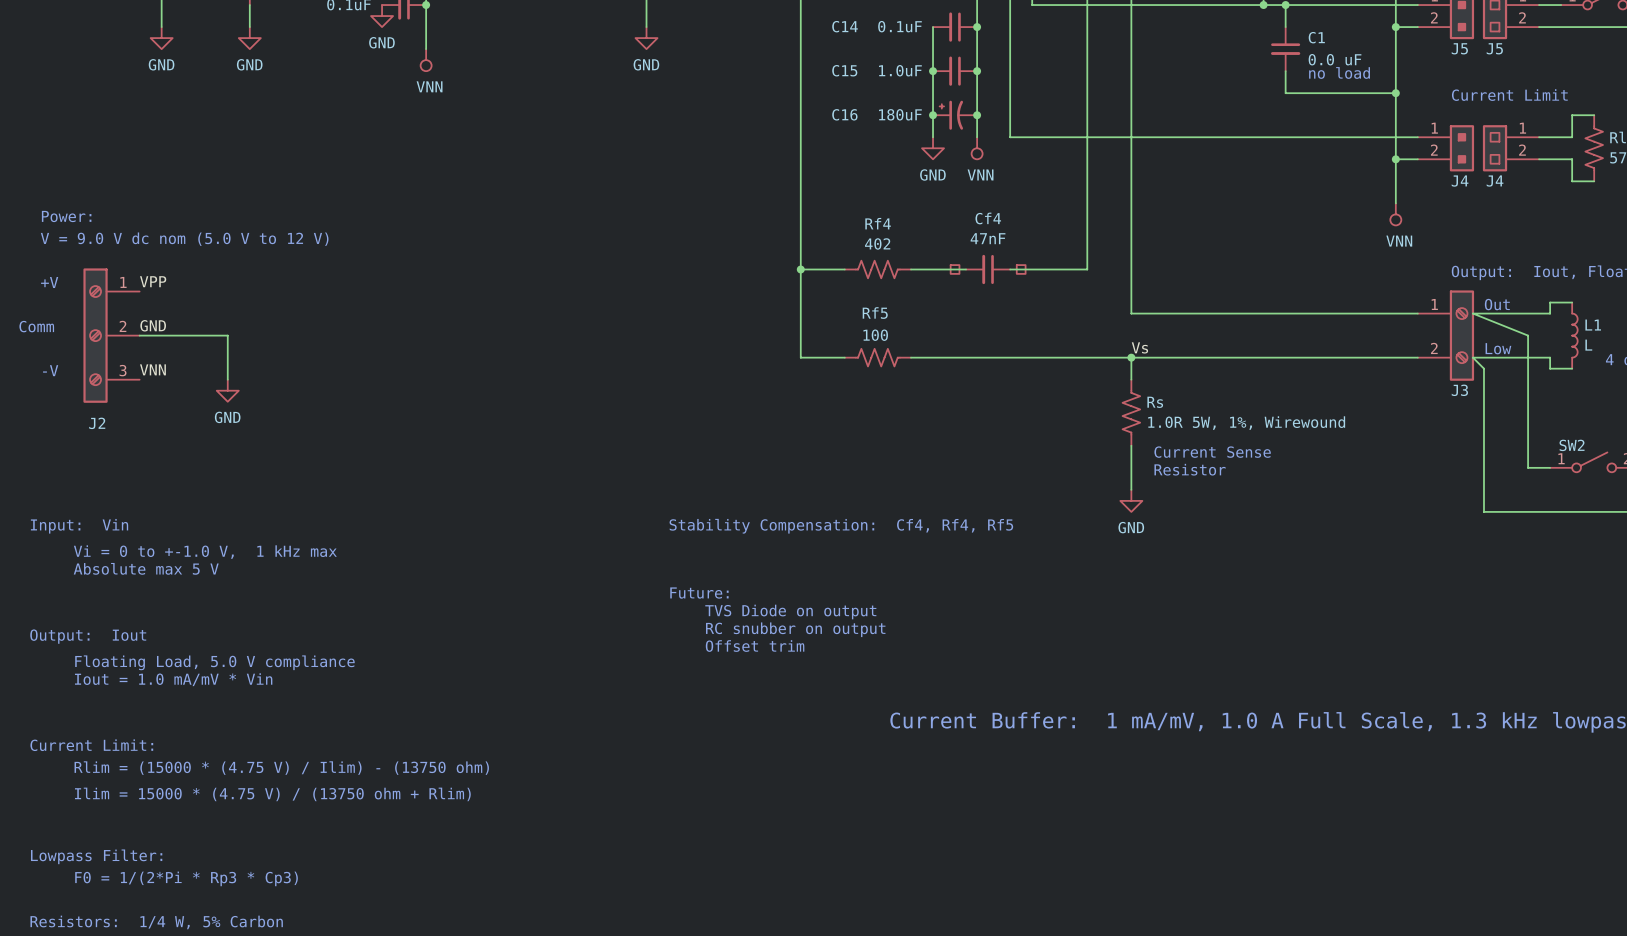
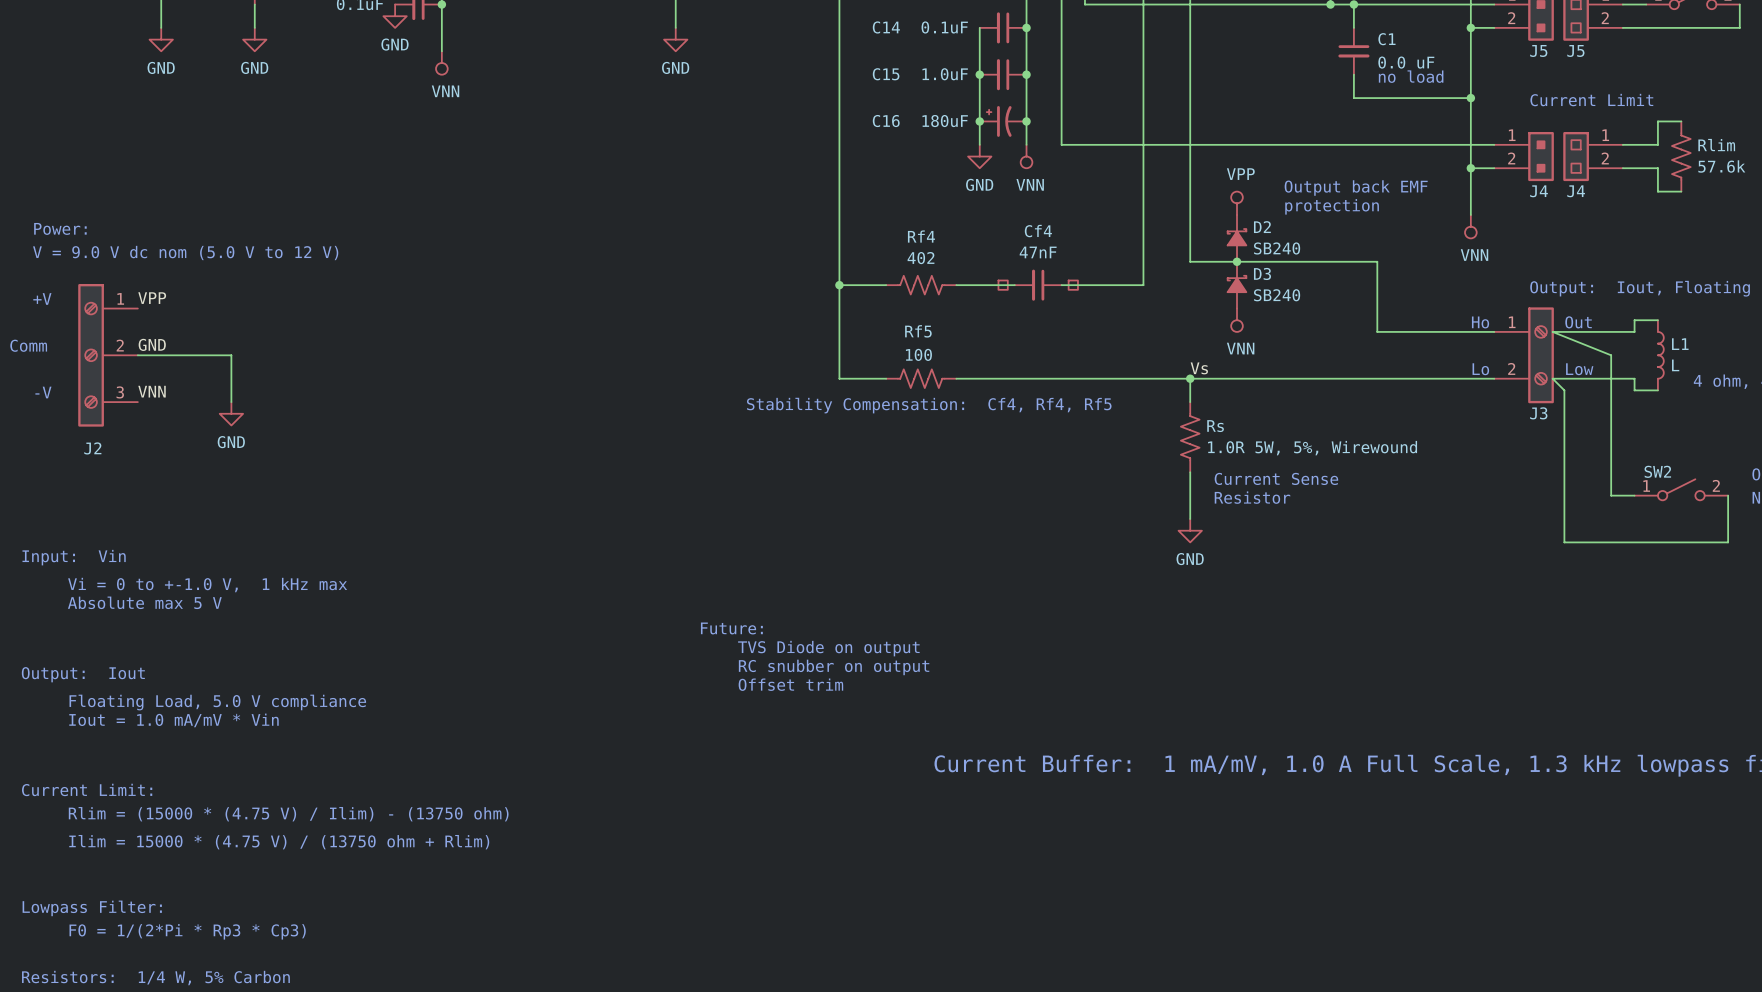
text: none -> Output back EMF (1356, 188)
power symbol: none -> VPP (1237, 203)
text: none -> protection (1332, 206)
D2: none -> SB240 (1237, 238)
wire: (1131, 247) (1131, 313) (1307, 313) -> (1190, 261) (1377, 261) (1377, 331)
junction: none -> (1237, 261)
D3: none -> SB240 (1237, 285)
power symbol: none -> VNN (1237, 320)
text: none -> Ho (1480, 322)
text: none -> Lo (1480, 369)
Rs value: 1.0R 5W, 1%, Wirewound (1246, 423) -> 1.0R 5W, 5%, Wirewound (1312, 448)
text position: Stability Compensation: Cf4, Rf4, Rf5 (841, 526) -> Stability Compensation: Cf4, Rf4, Rf5 (929, 405)

